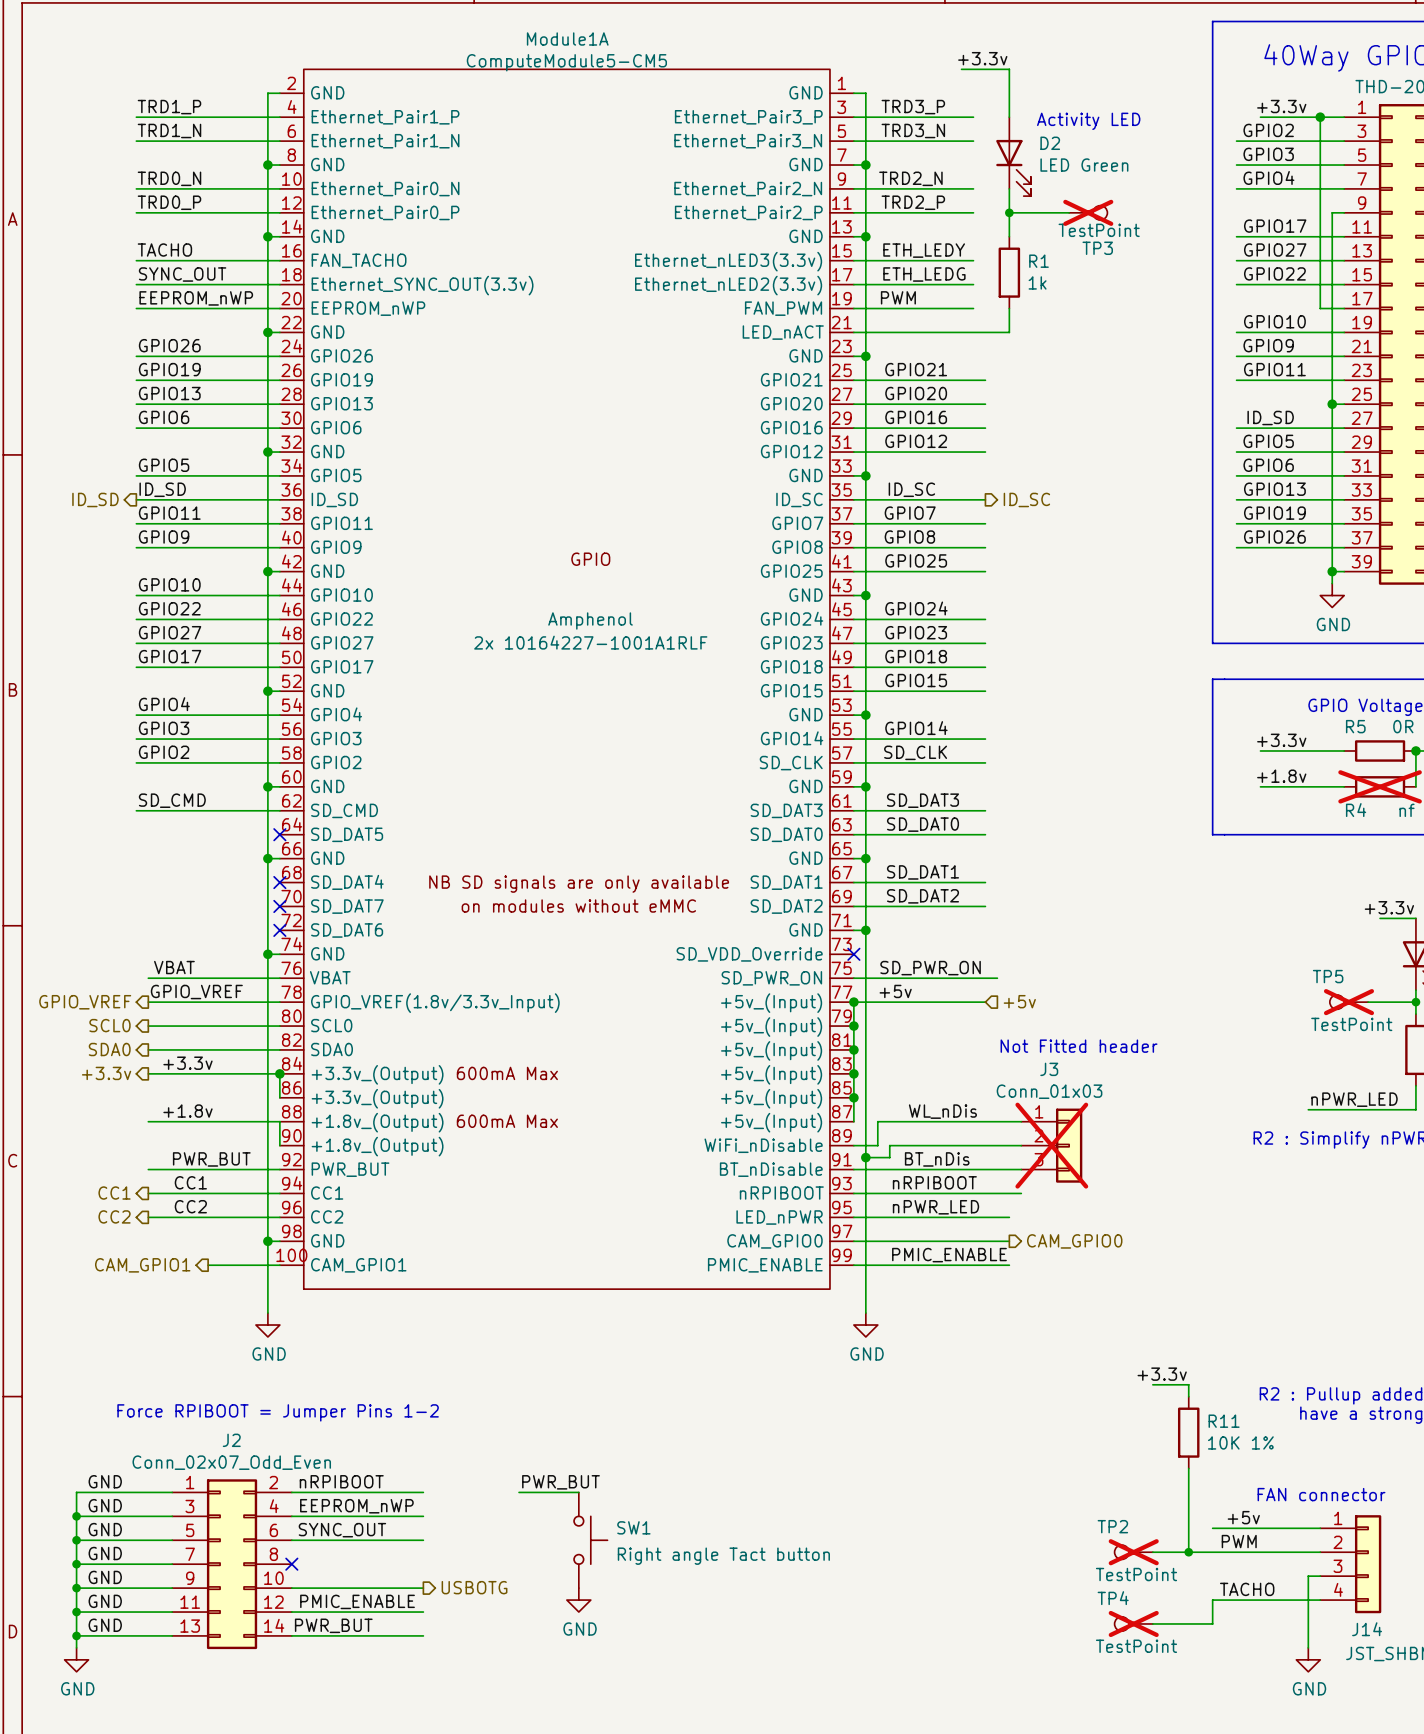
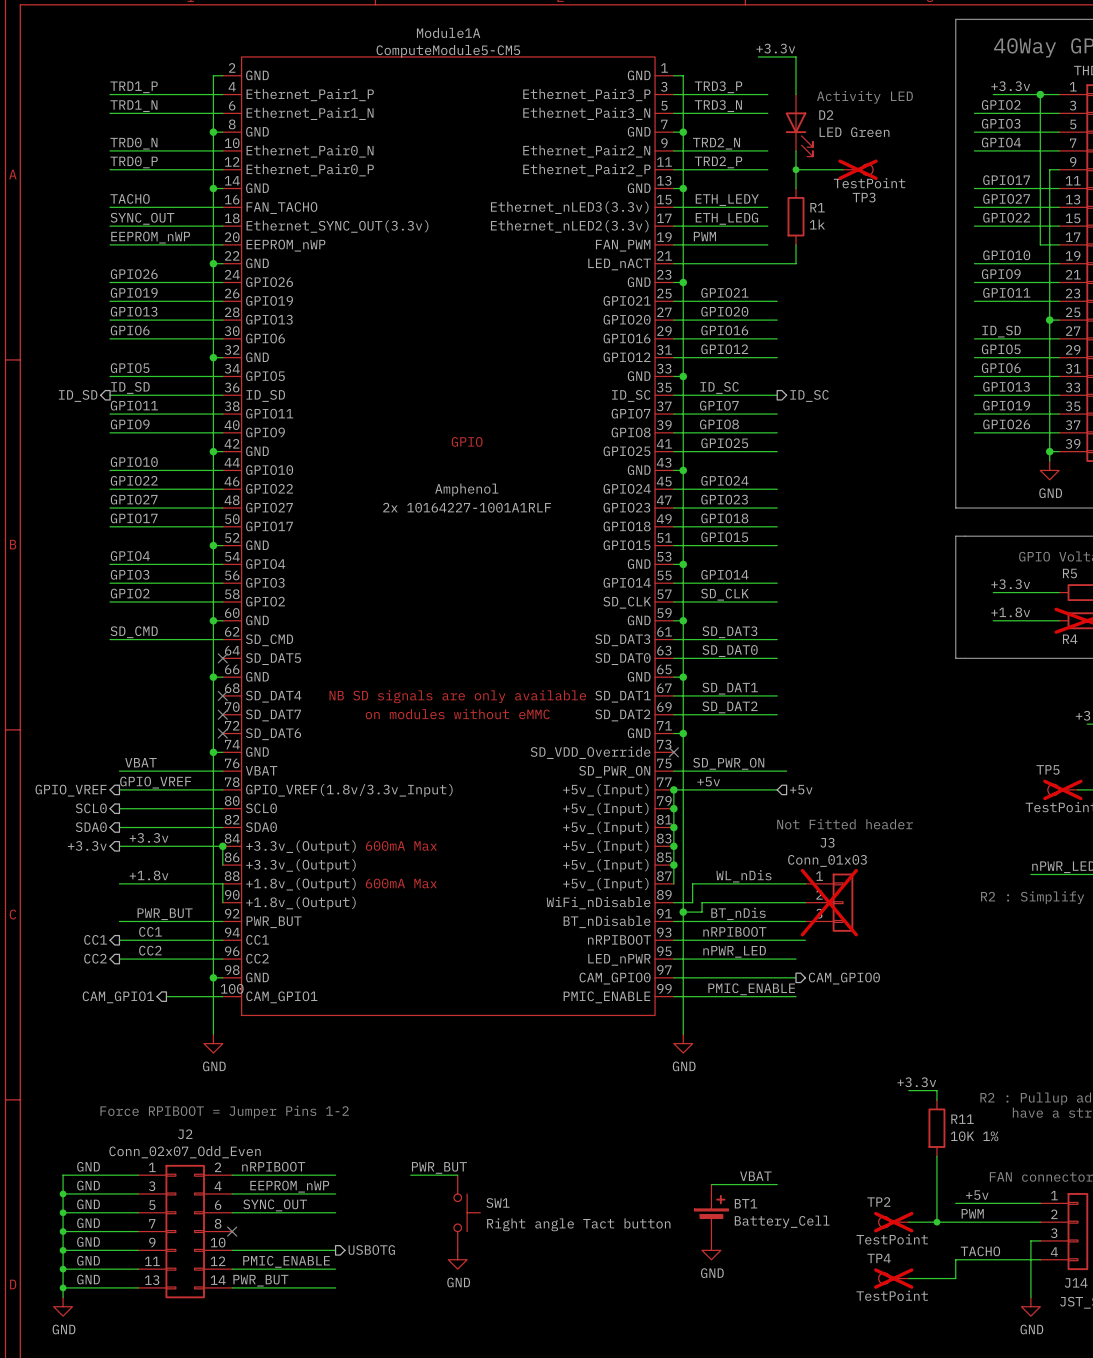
label: none -> VBAT (755, 1176)
wire: none -> (711, 1184) (777, 1184)
BT1: none -> Battery_Cell (711, 1212)
power symbol: none -> GND (711, 1250)

